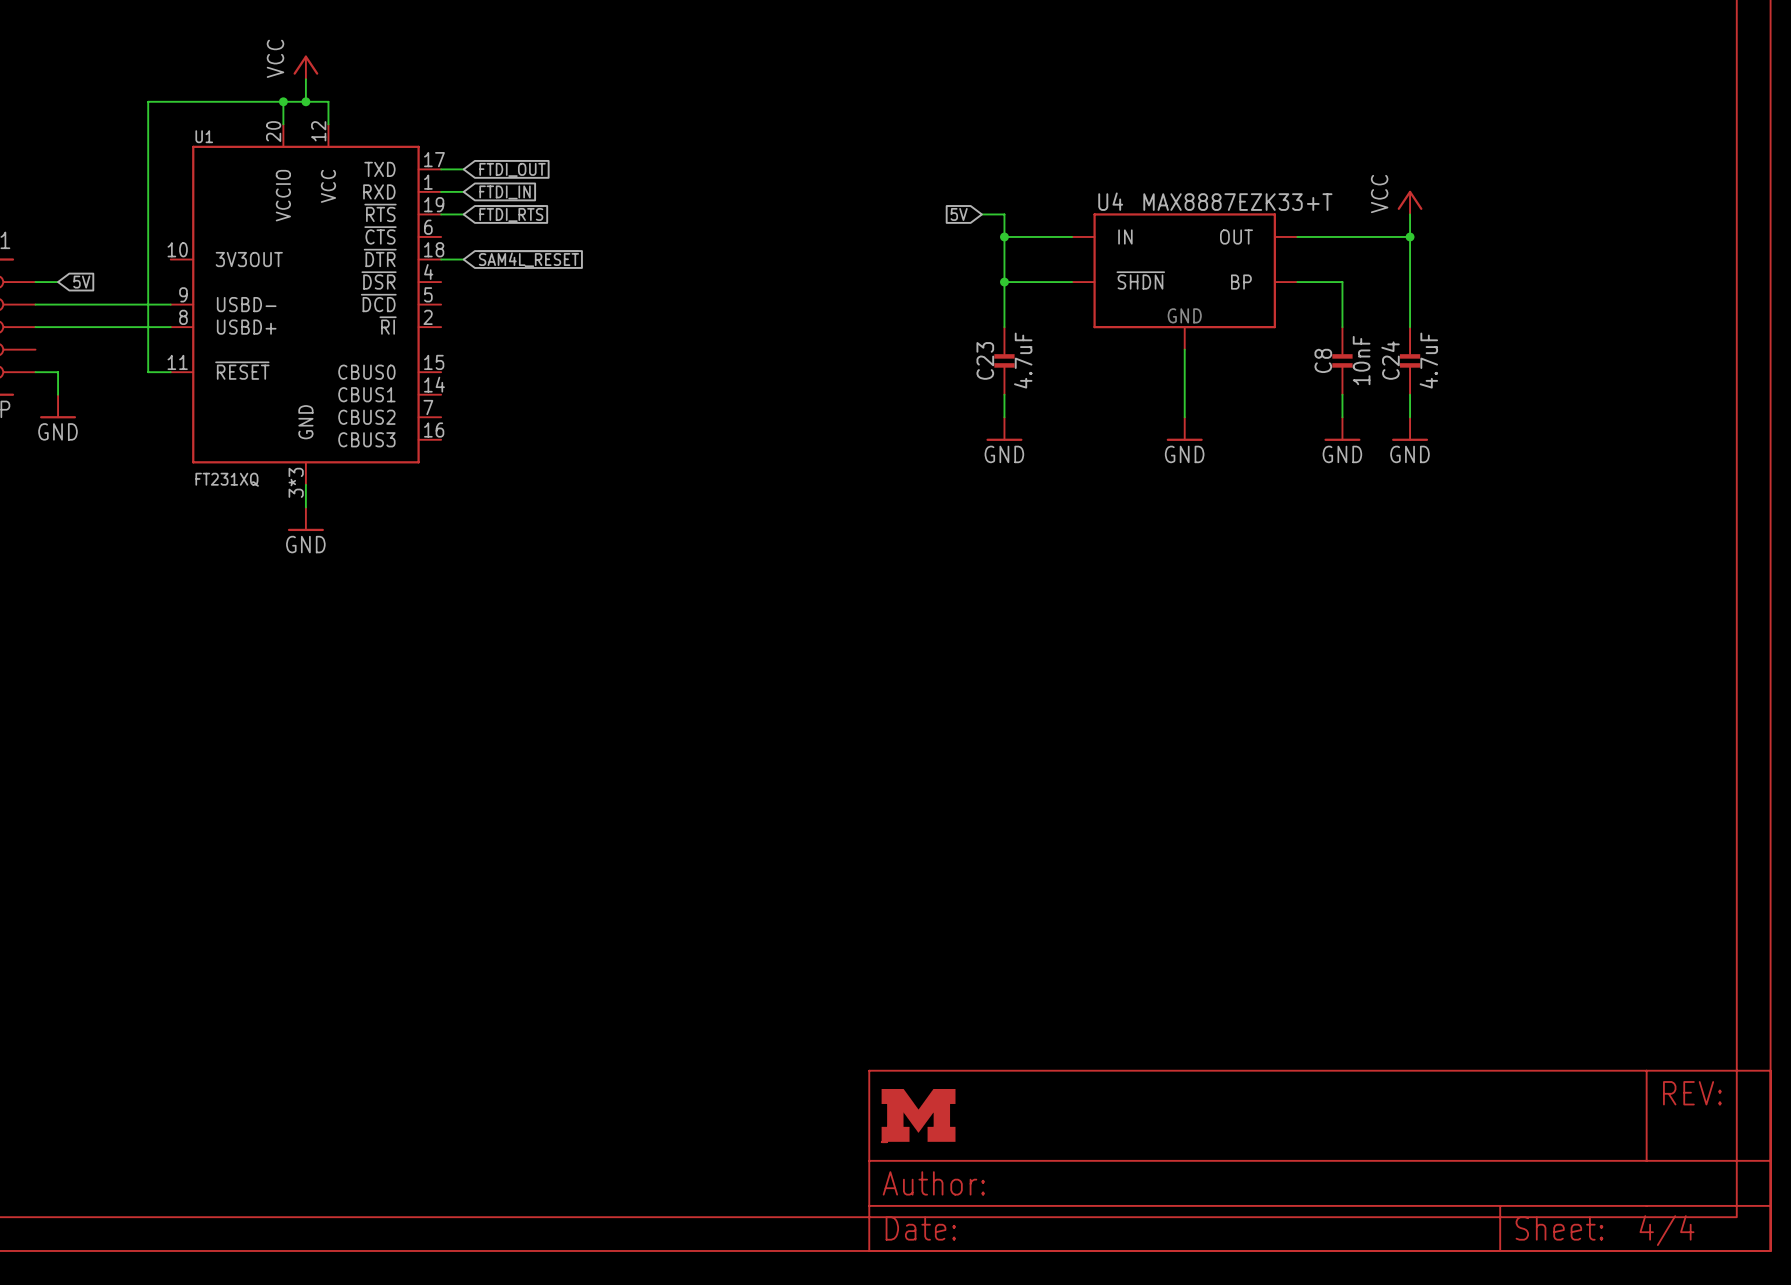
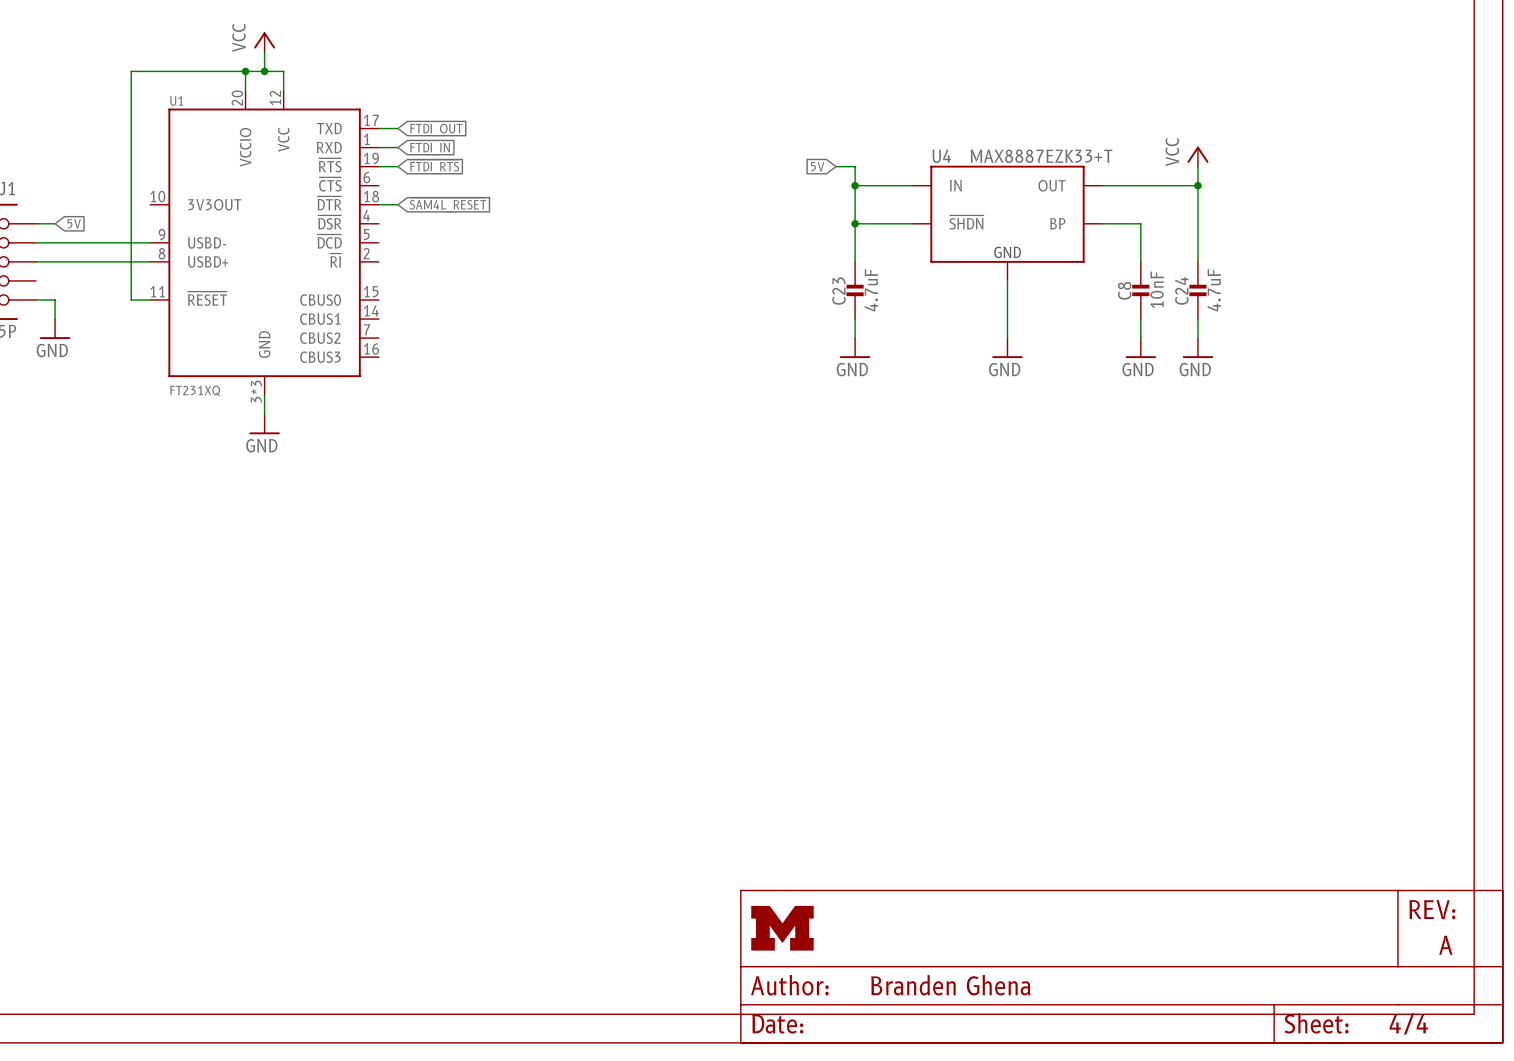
part text: none -> A (1445, 945)
part text: none -> Branden Ghena (950, 985)

